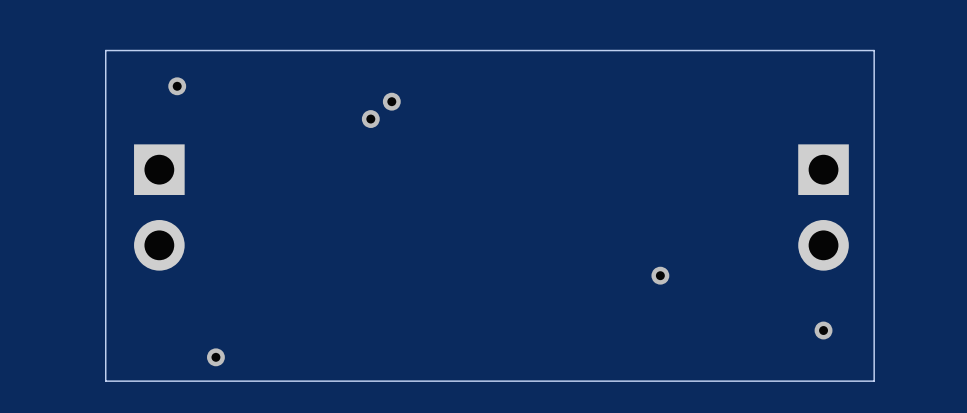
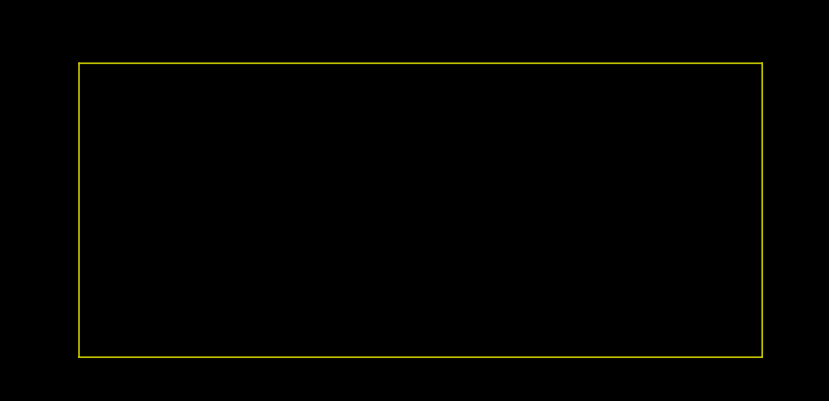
via: (177, 86) -> none
via: (391, 101) -> none
via: (370, 119) -> none
part: (159, 207) -> none
part: (823, 207) -> none
via: (660, 275) -> none
via: (823, 330) -> none
via: (215, 357) -> none

